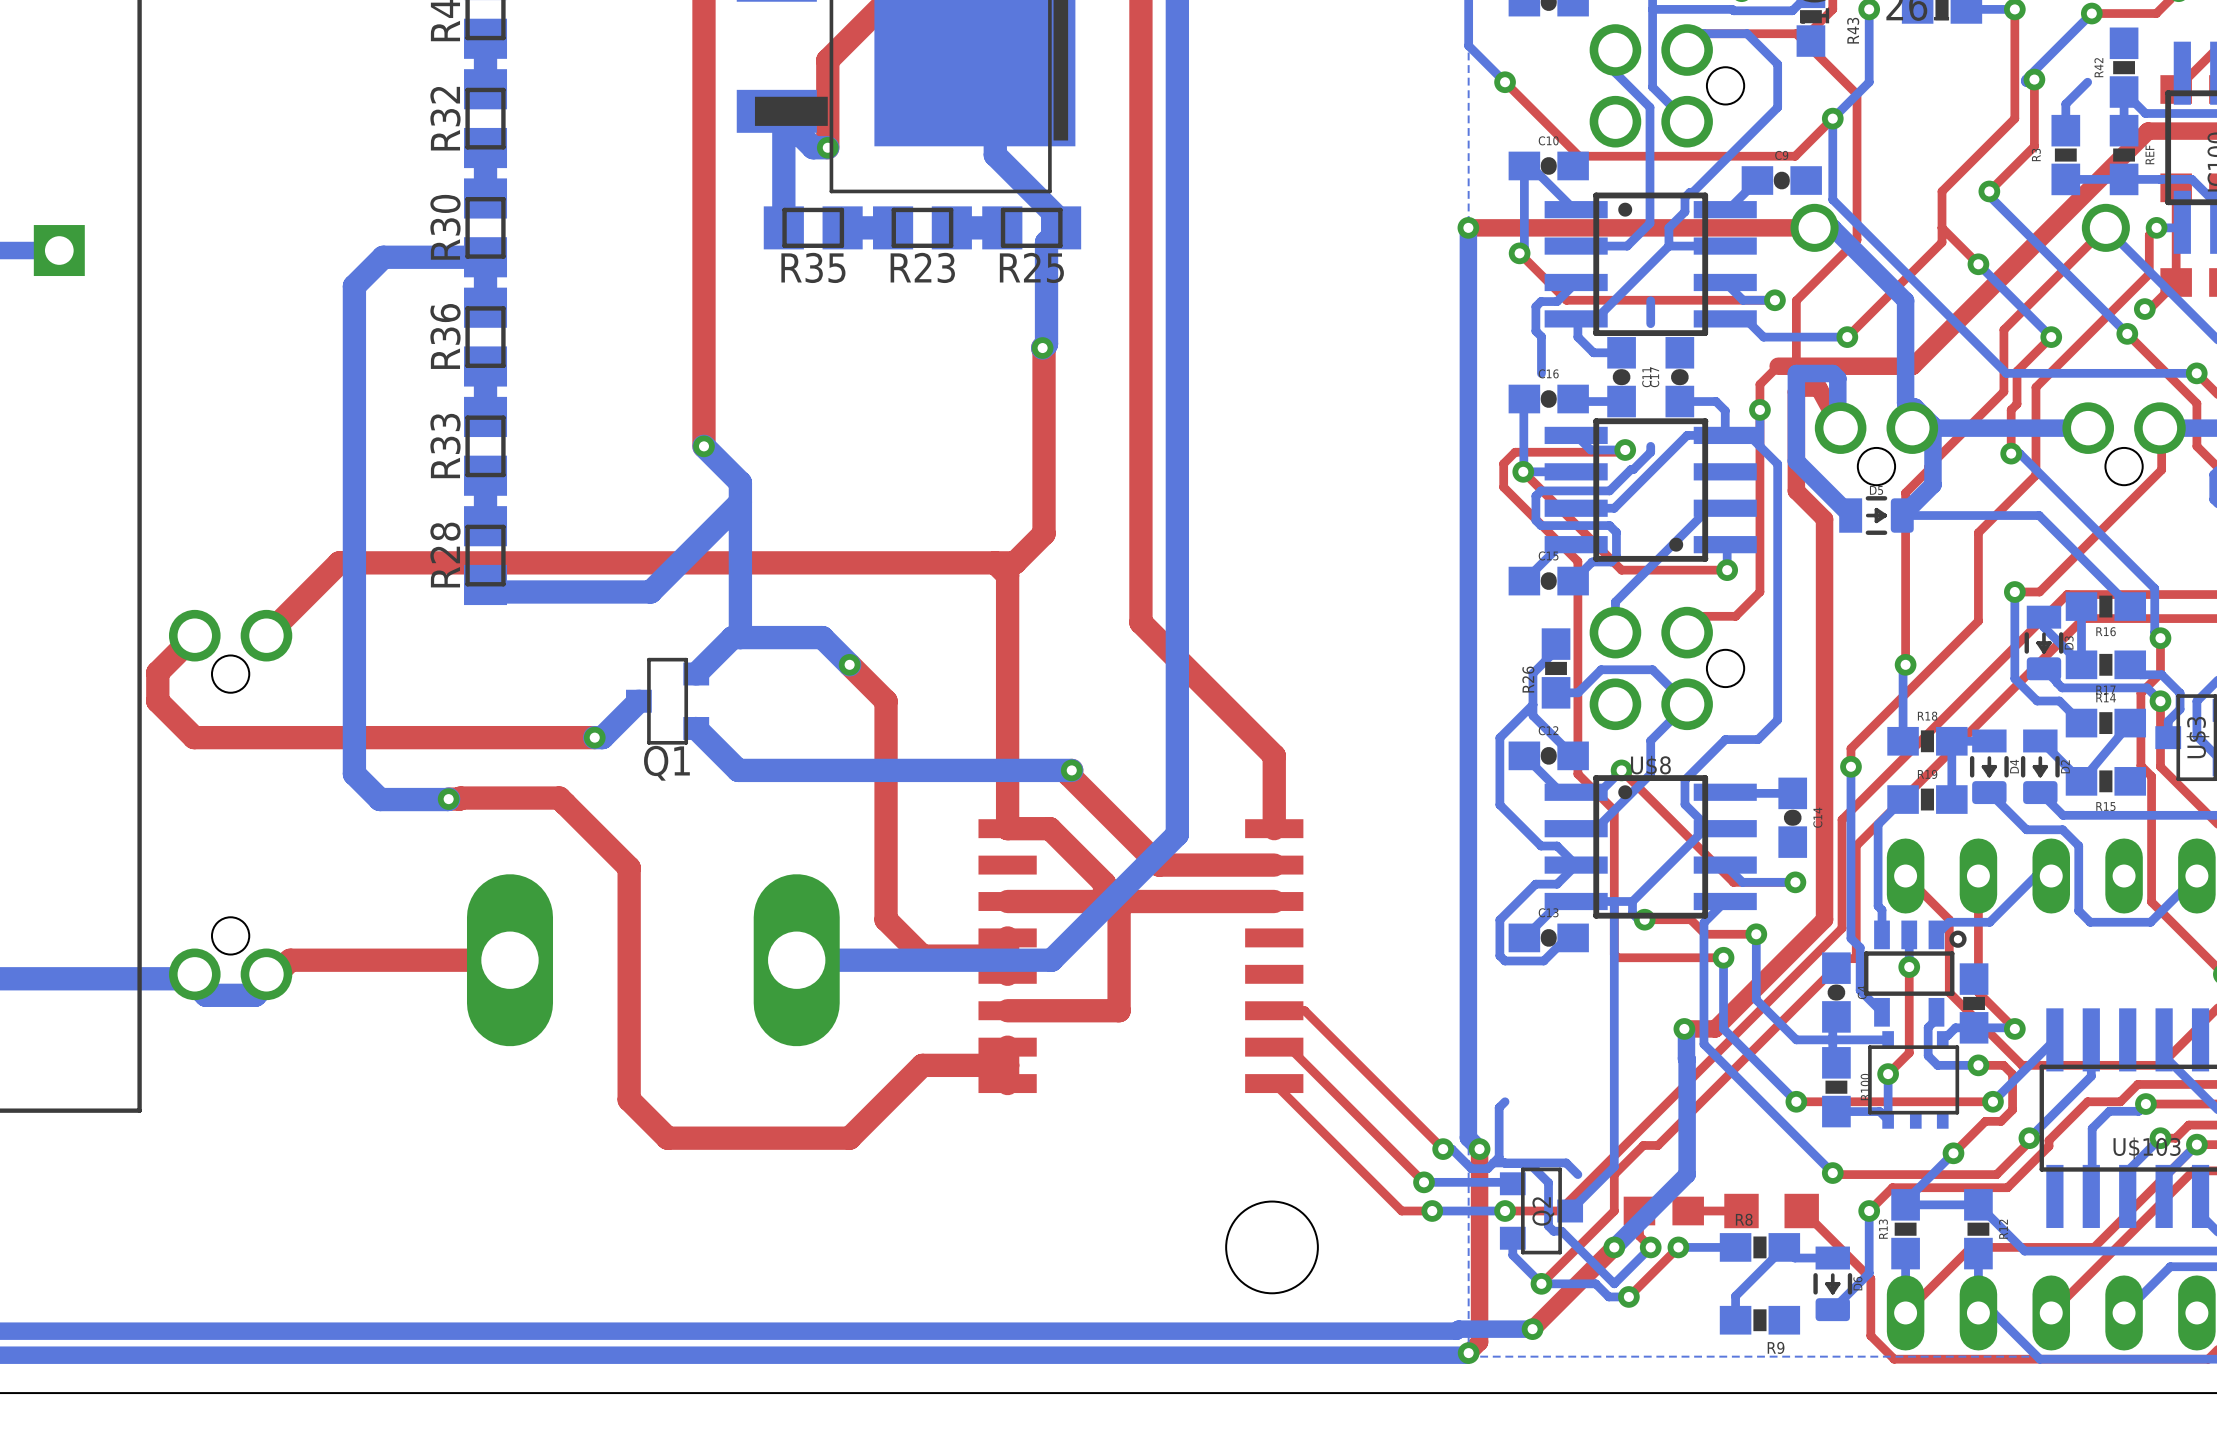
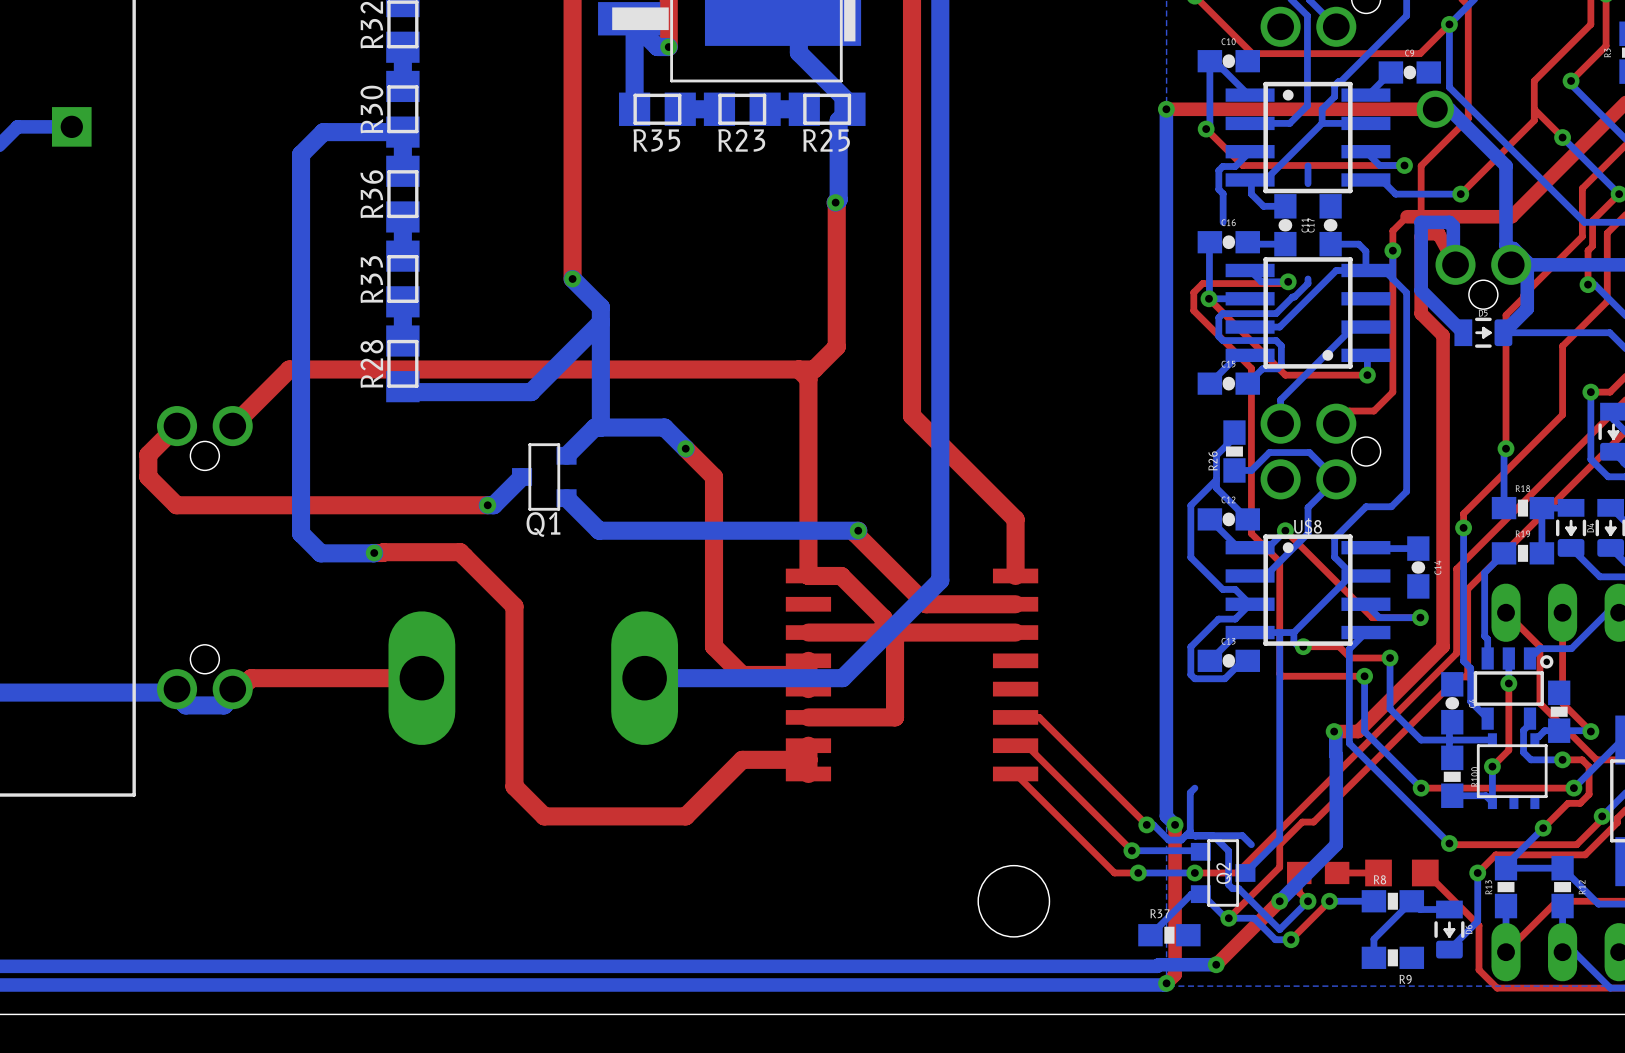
top track: (1614, 1203) (1614, 1211) (1541, 1283) -> (1279, 867) (1228, 918)
bottom track: (1512, 1238) (1512, 1255) (1541, 1283) (1595, 1283) -> (1150, 935) (1191, 894) (1201, 894) (1225, 918) (1254, 918) (1265, 929)
via position: (1541, 1283) -> (1228, 918)
R37: none -> (1169, 935)

